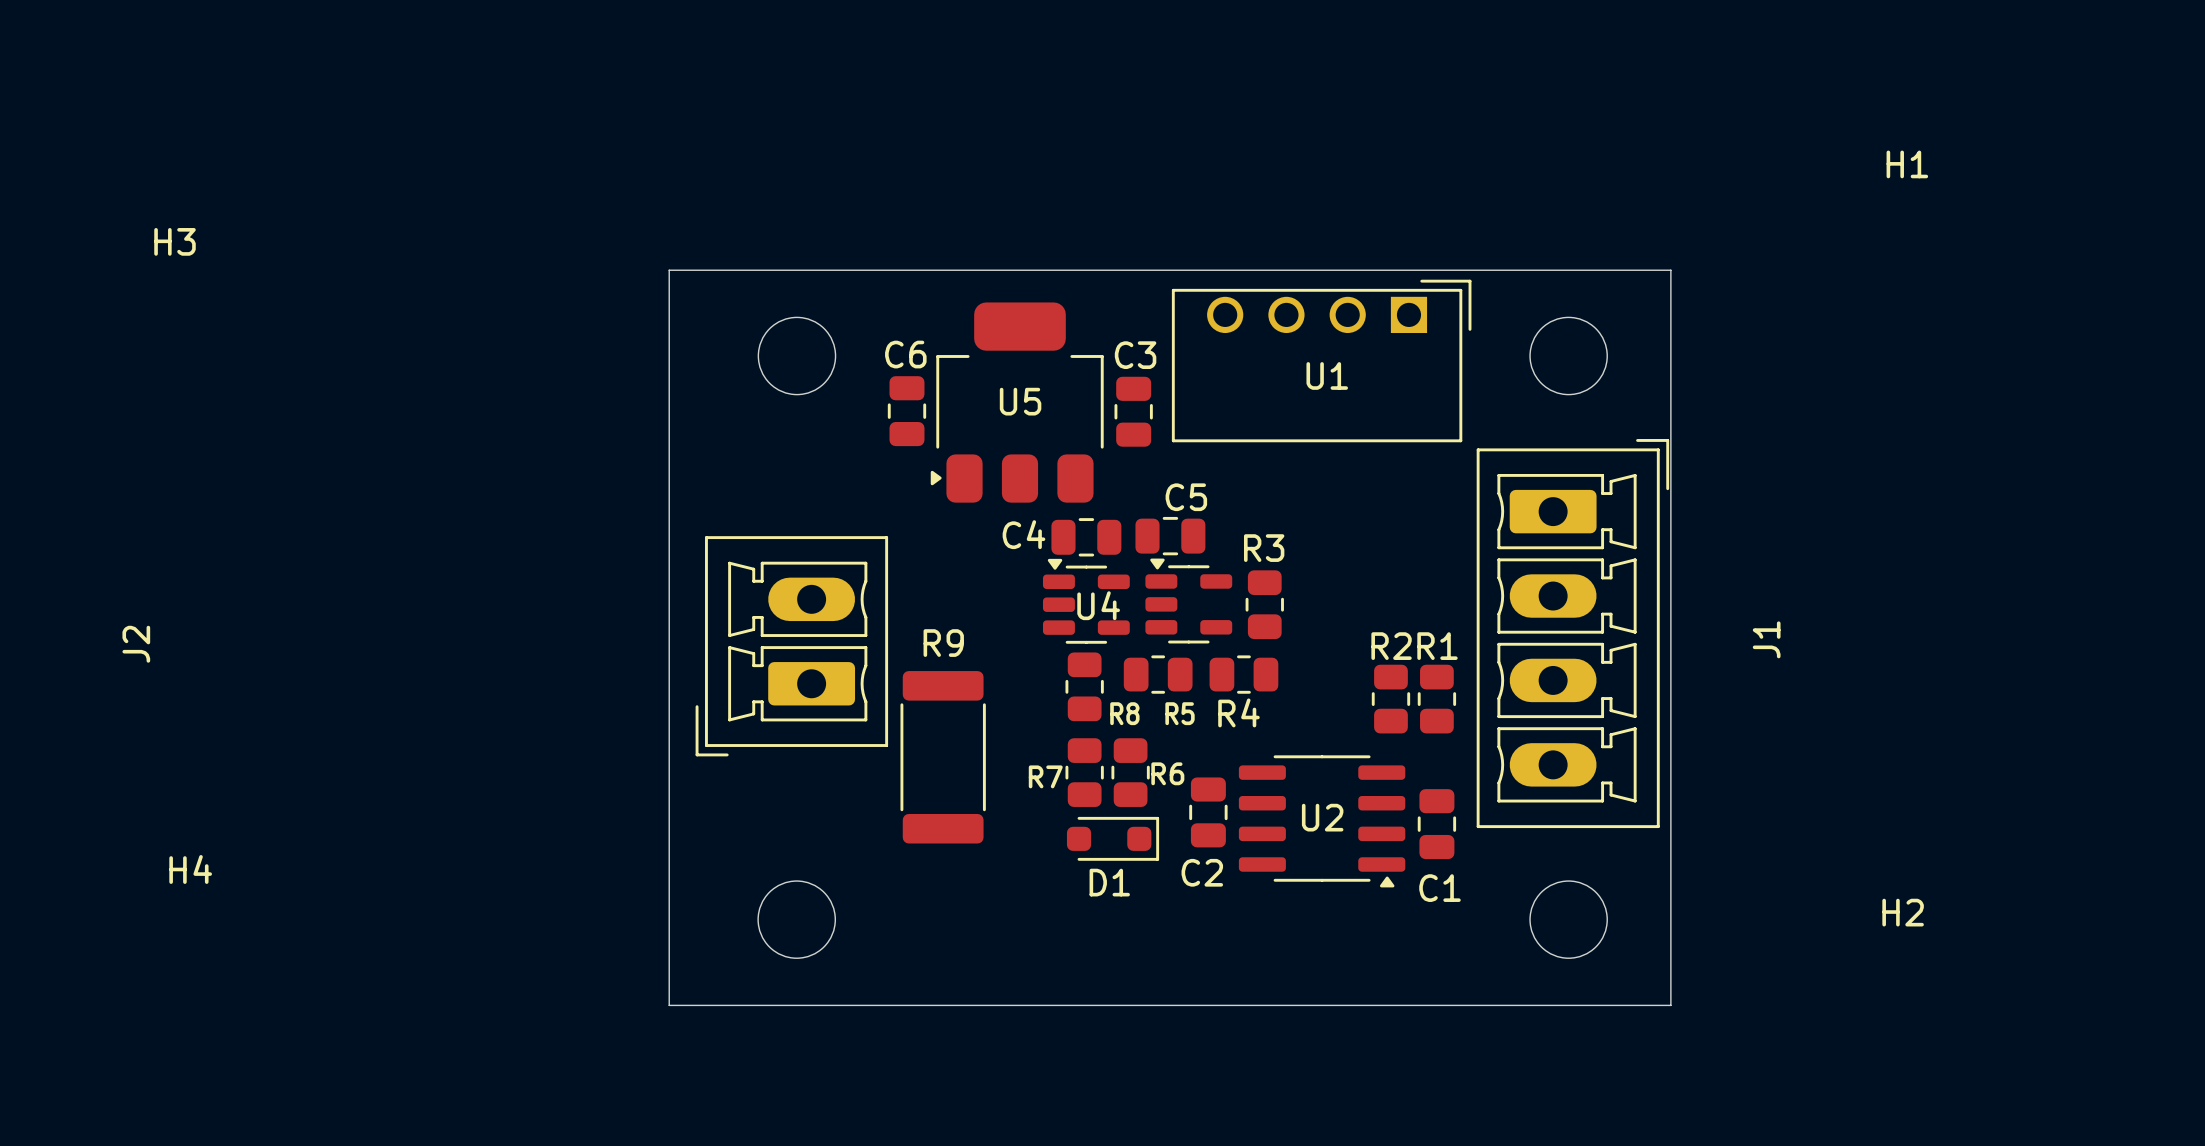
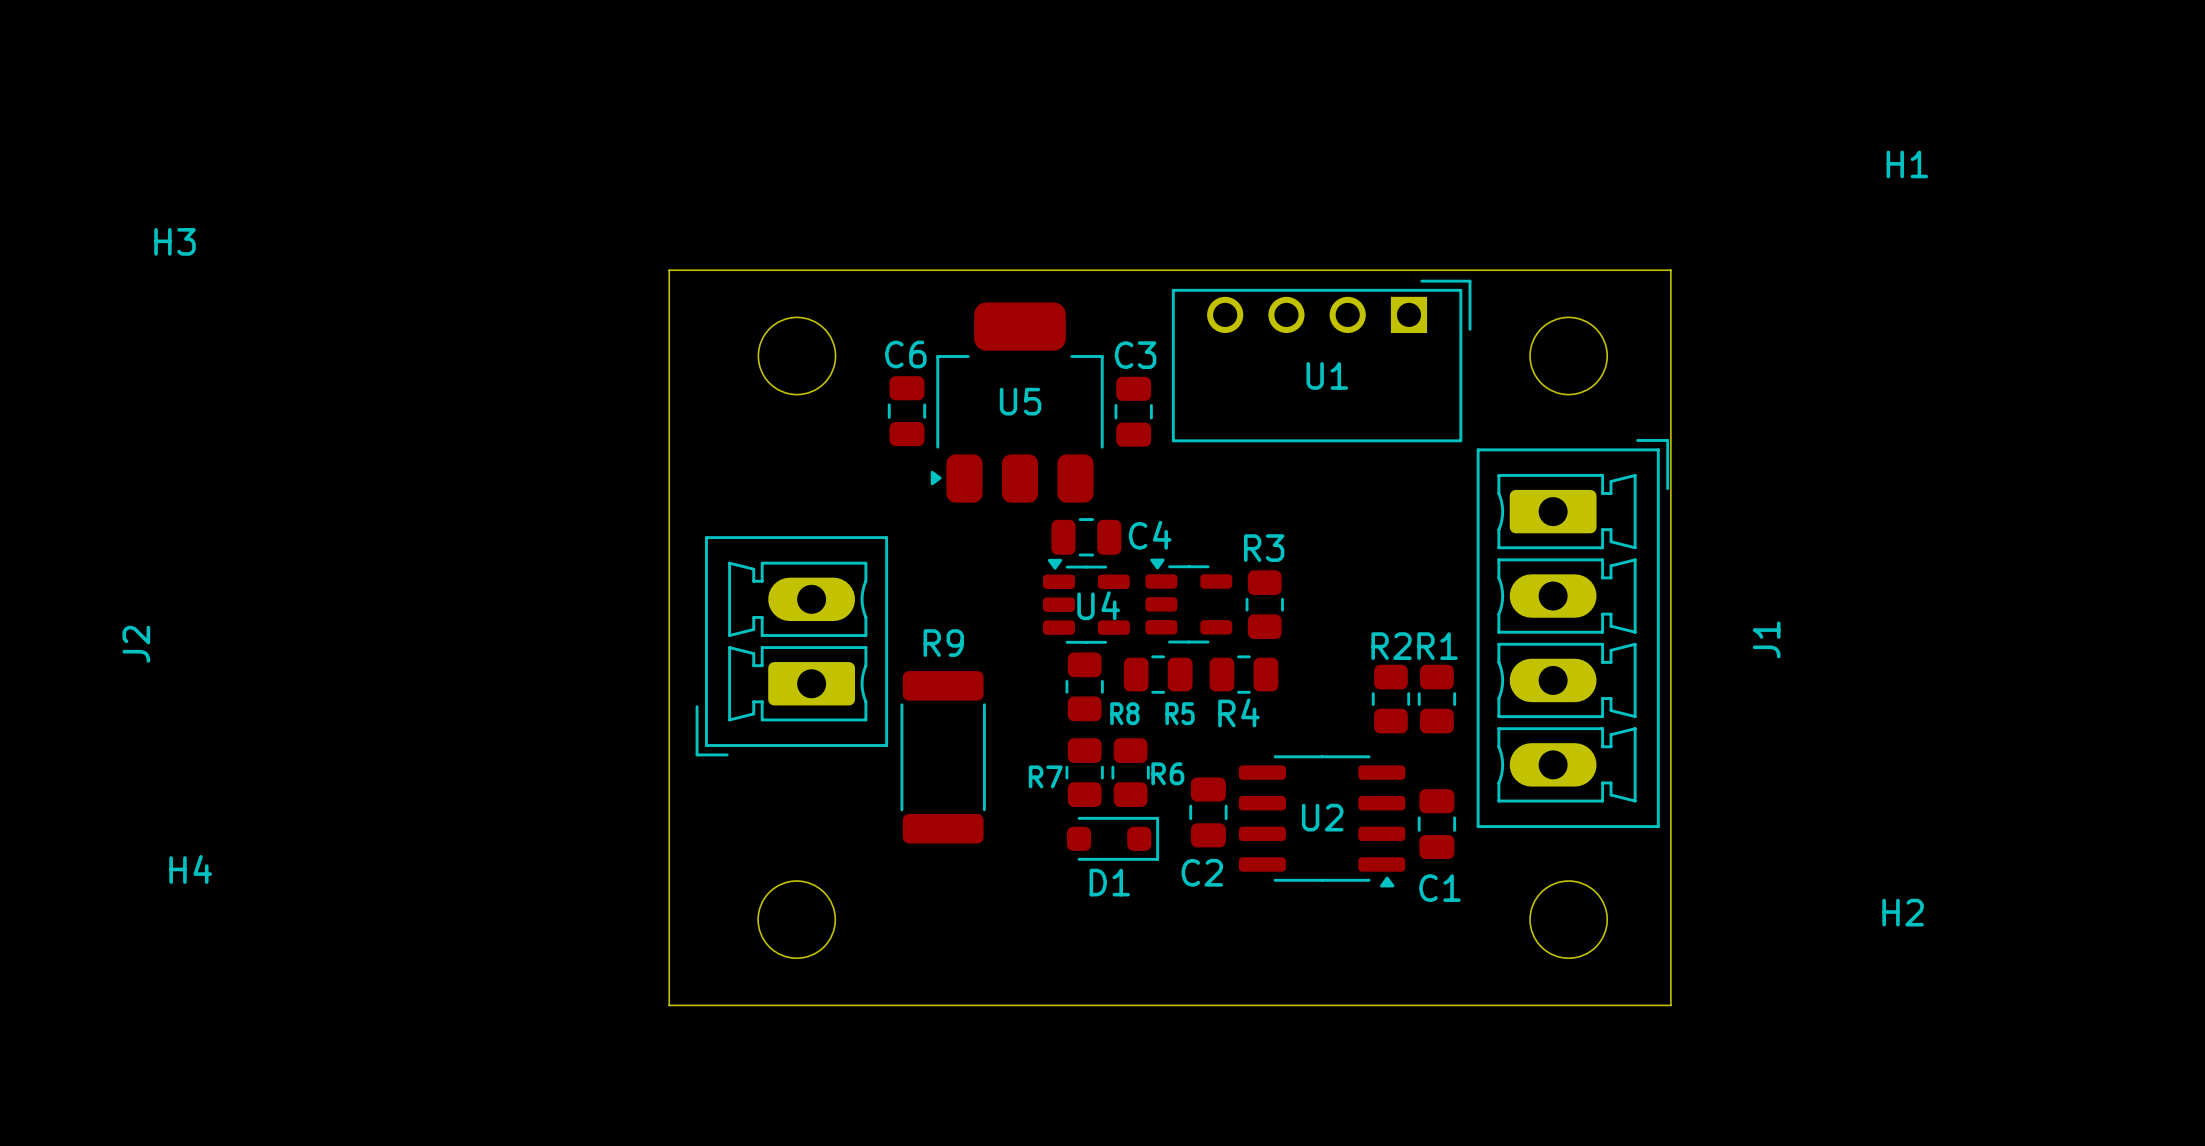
C4 name position: C4 (1023, 534) -> C4 (1150, 535)
C5: (1170, 536) -> none

